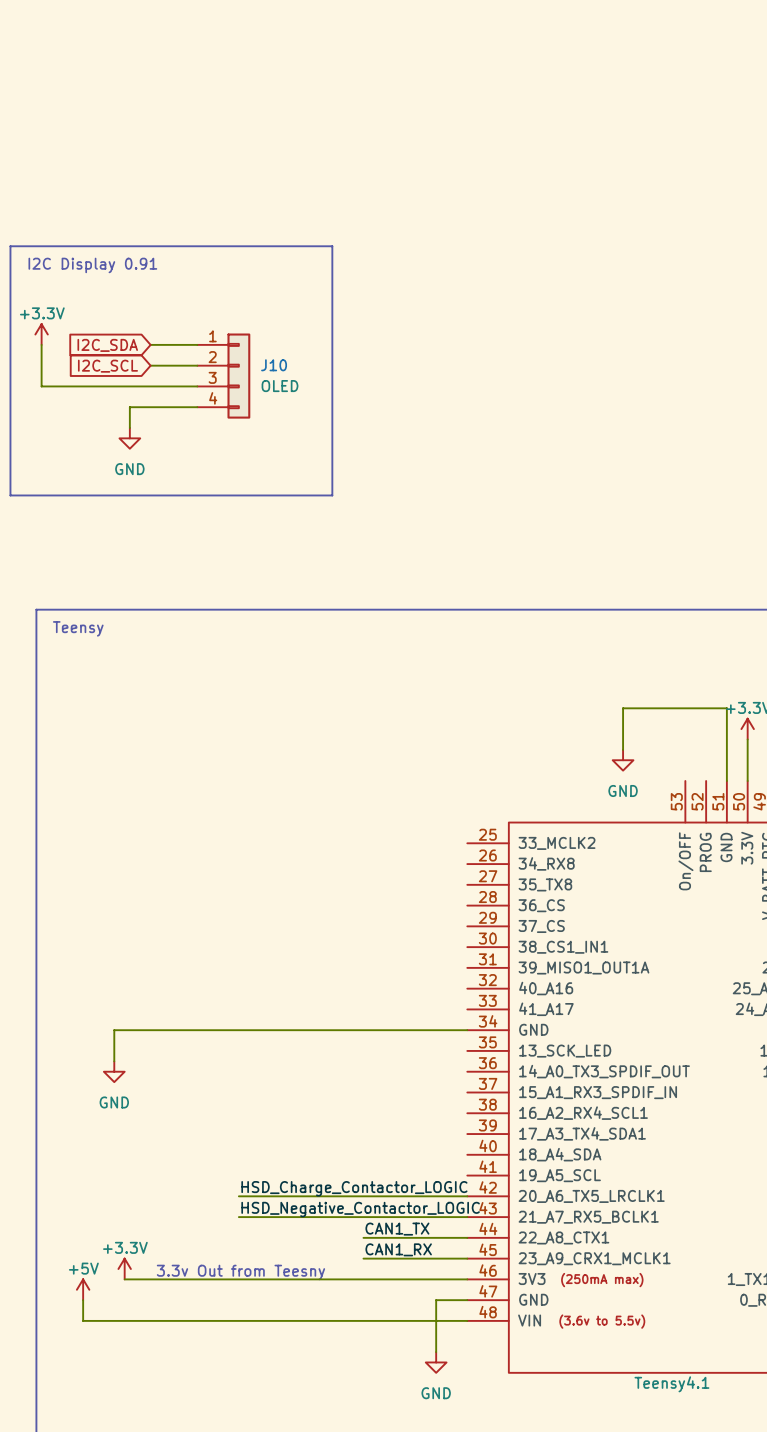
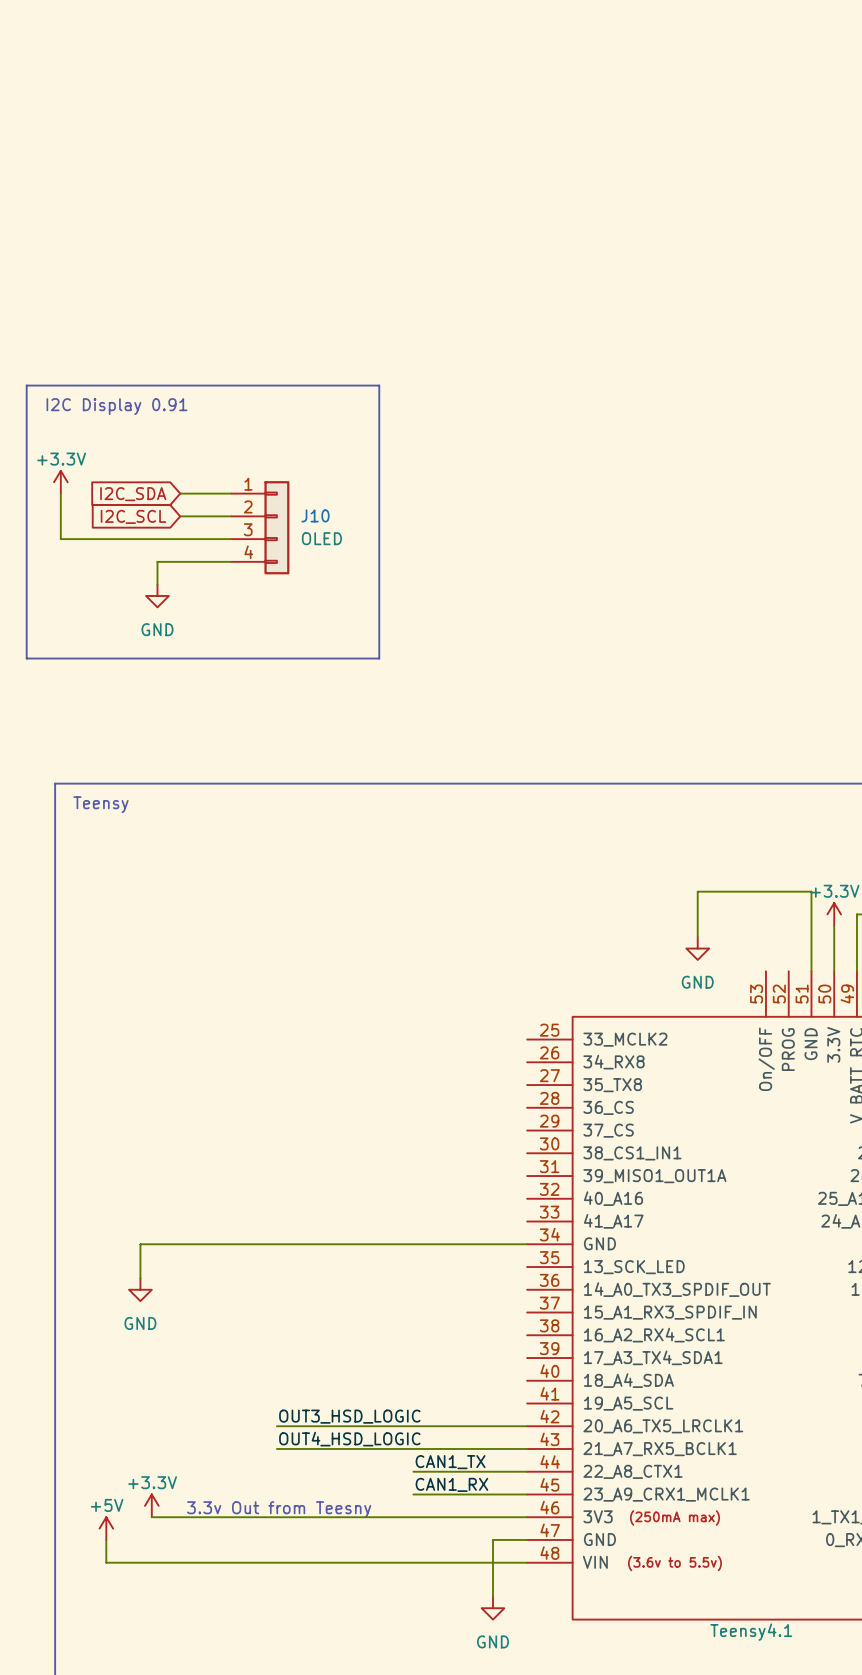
label: HSD_Charge_Contactor_LOGIC (354, 1188) -> OUT3_HSD_LOGIC (349, 1416)
label: HSD_Negative_Contactor_LOGIC (360, 1209) -> OUT4_HSD_LOGIC (349, 1439)

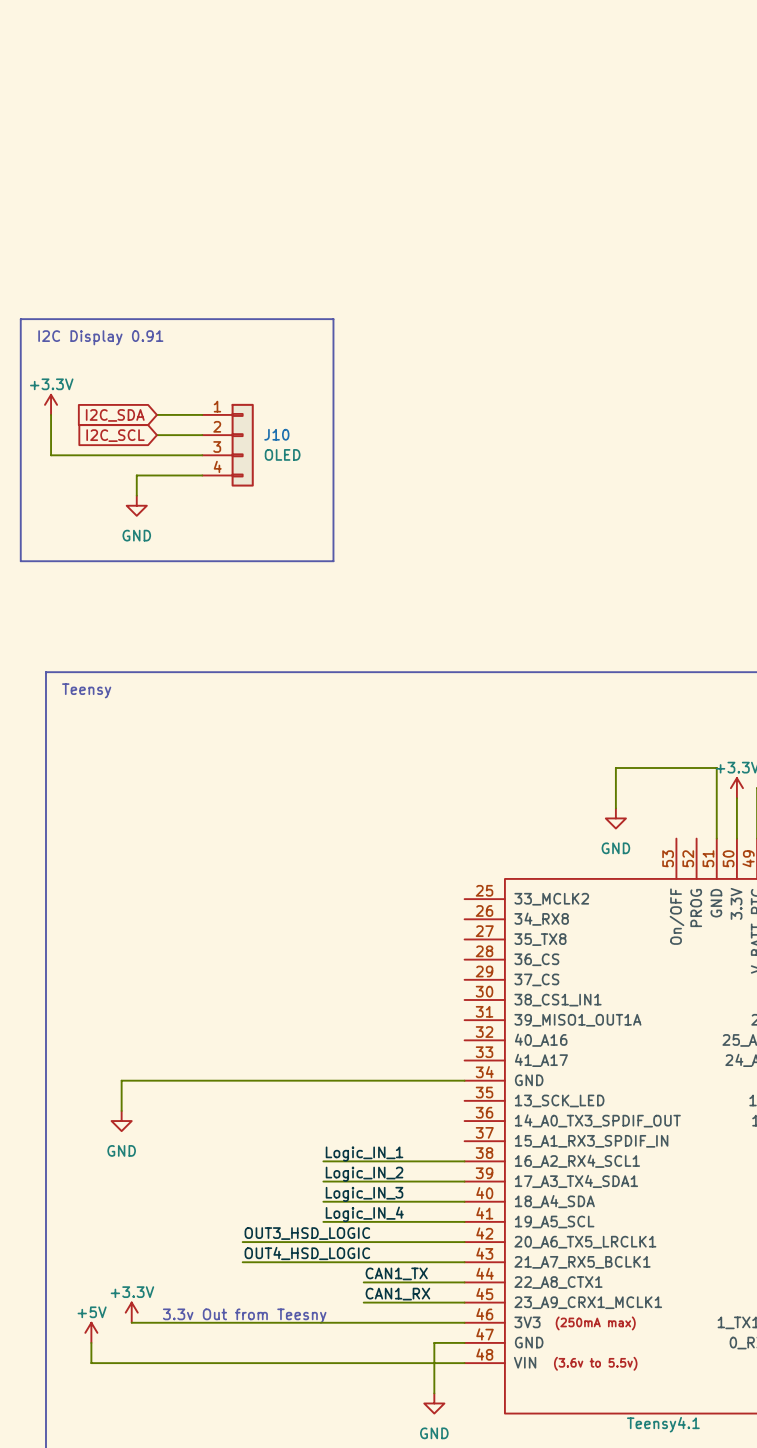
label: none -> Logic_IN_1 (364, 1154)
wire: none -> (323, 1161) (464, 1161)
label: none -> Logic_IN_2 (364, 1174)
wire: none -> (323, 1181) (464, 1181)
label: none -> Logic_IN_3 (364, 1194)
wire: none -> (323, 1201) (464, 1201)
label: none -> Logic_IN_4 (364, 1214)
wire: none -> (323, 1221) (464, 1221)

